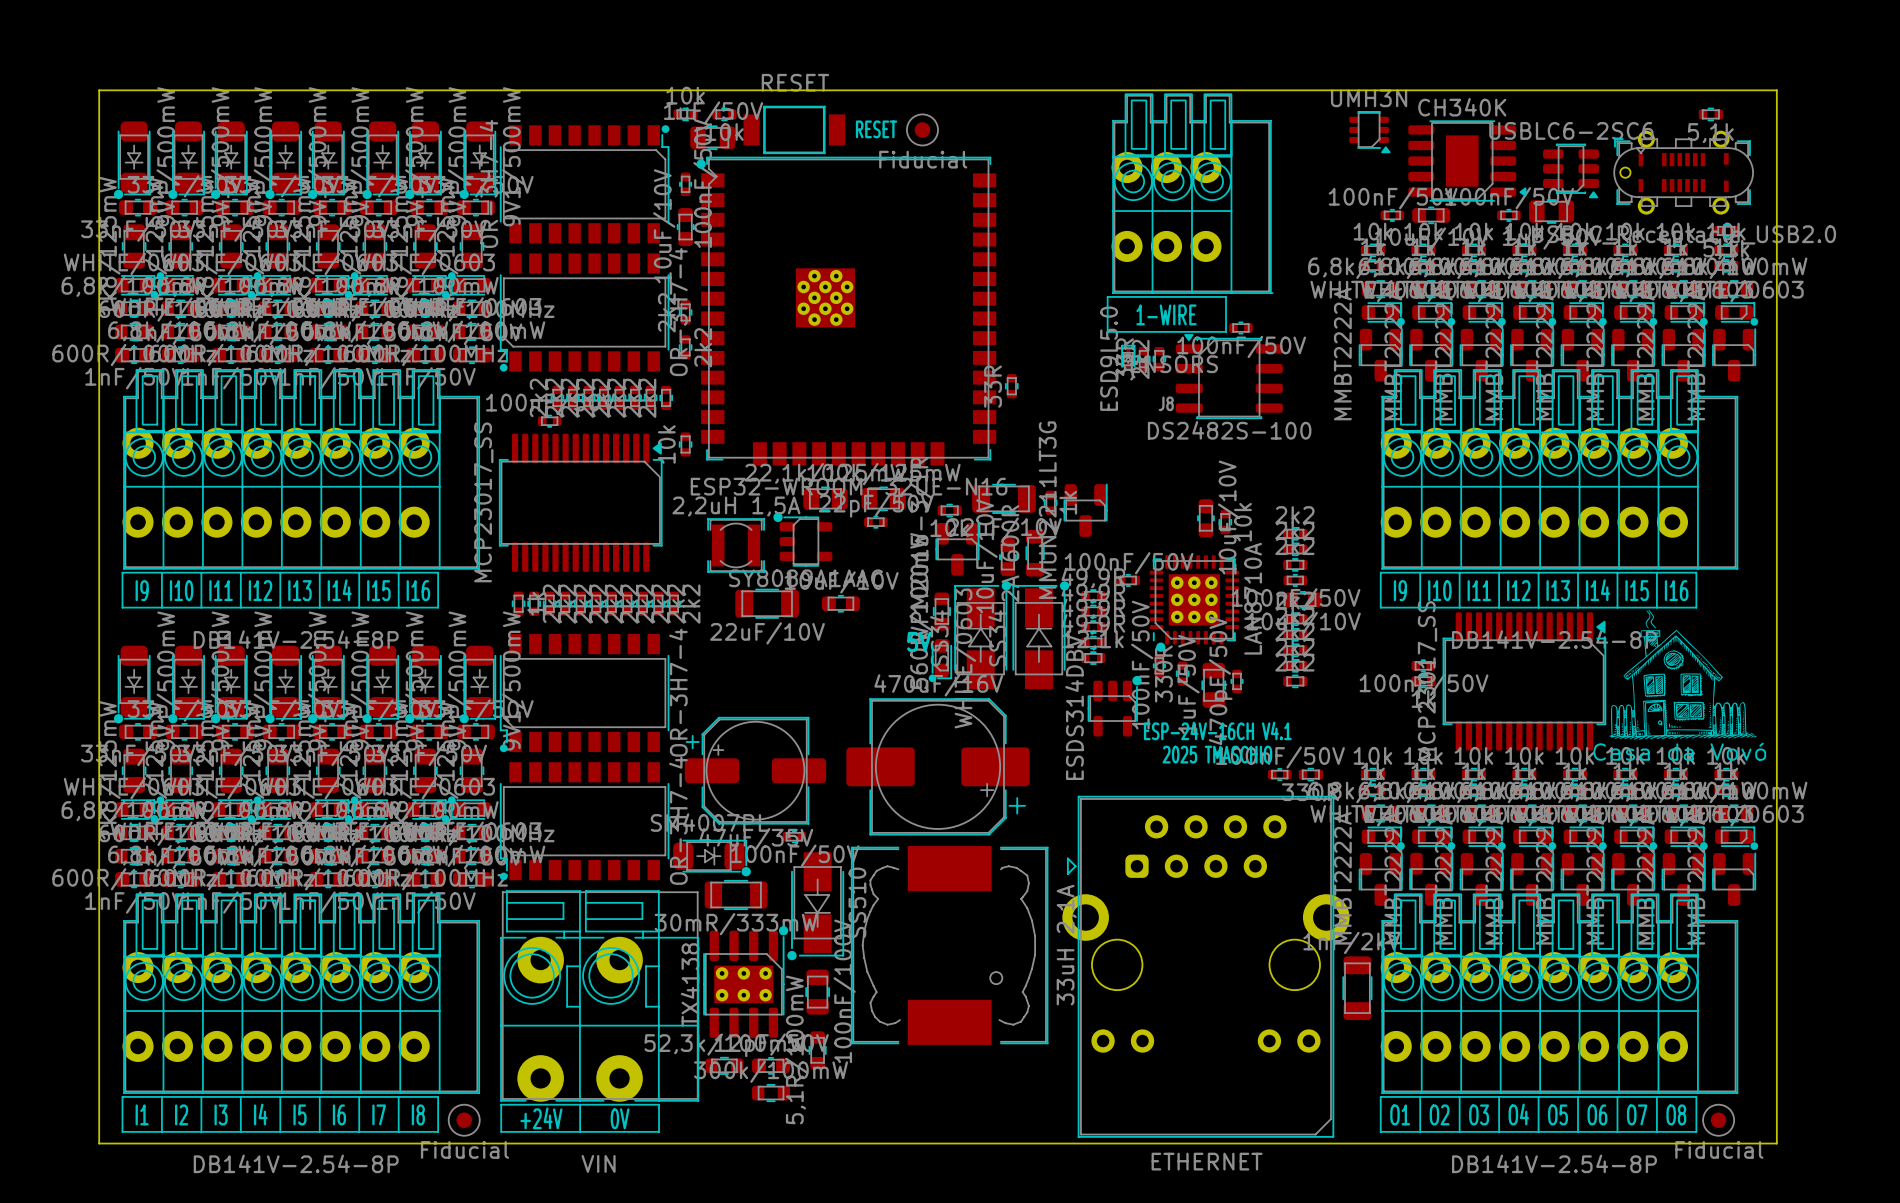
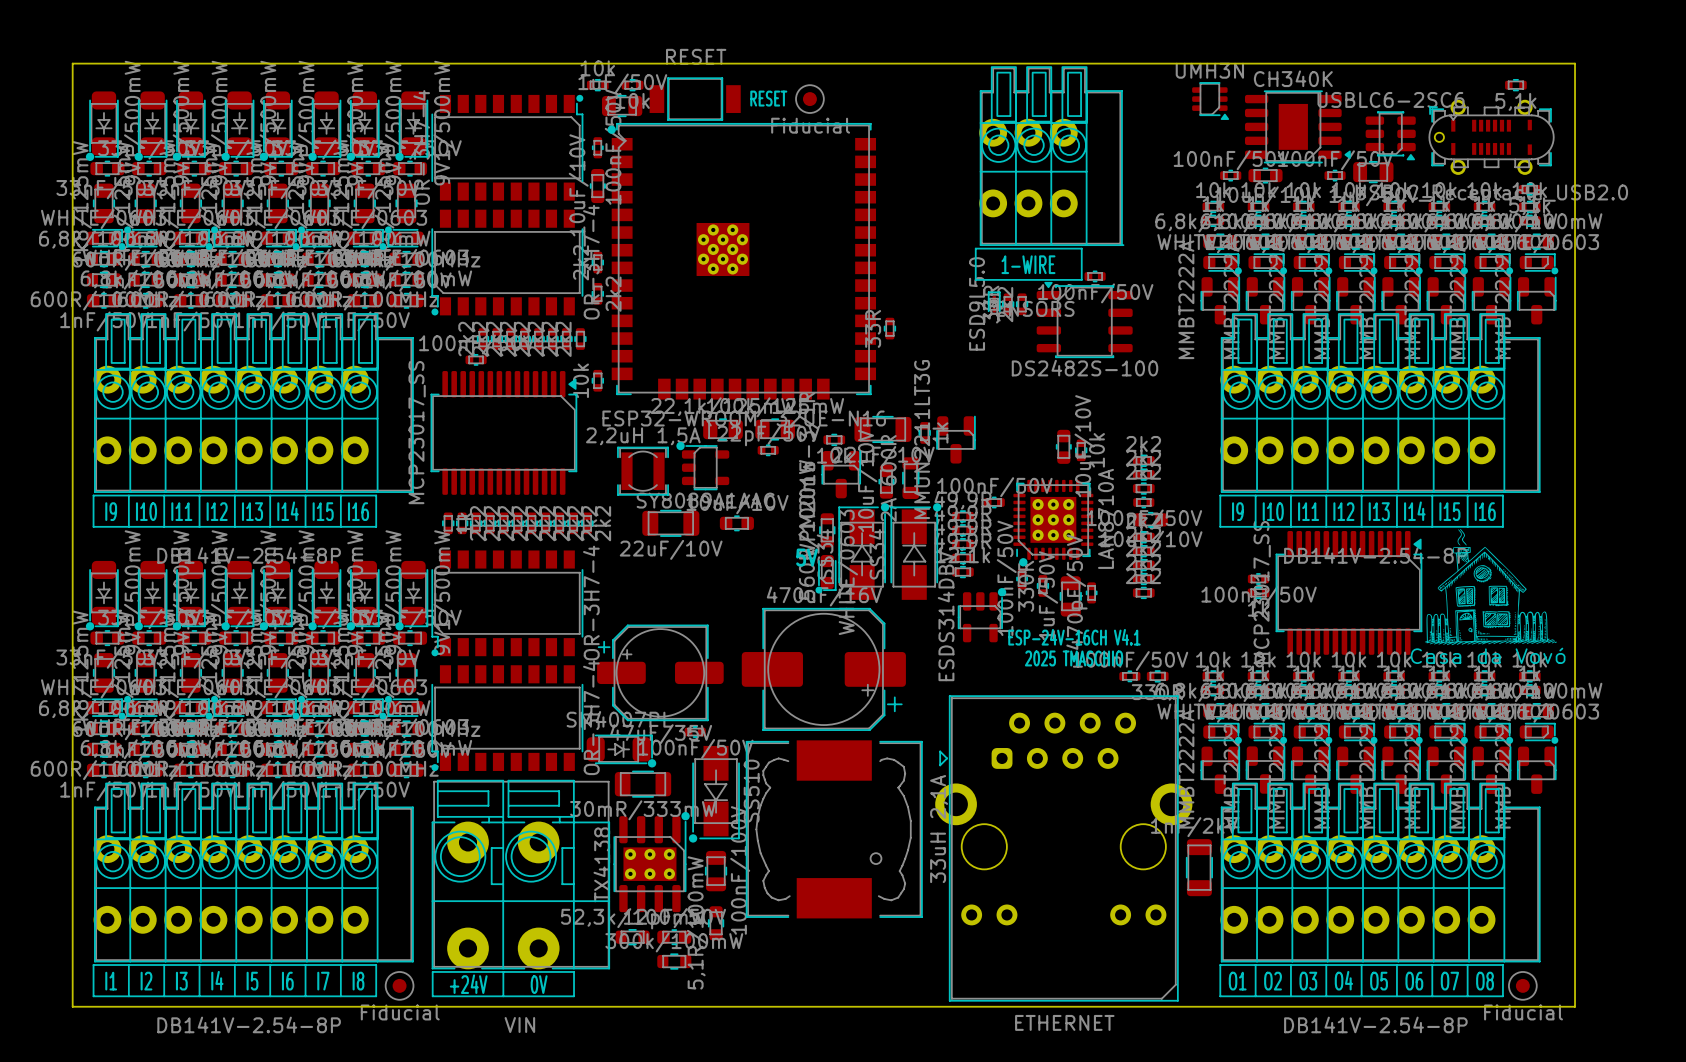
J8 name: J8 (1166, 403) -> none

